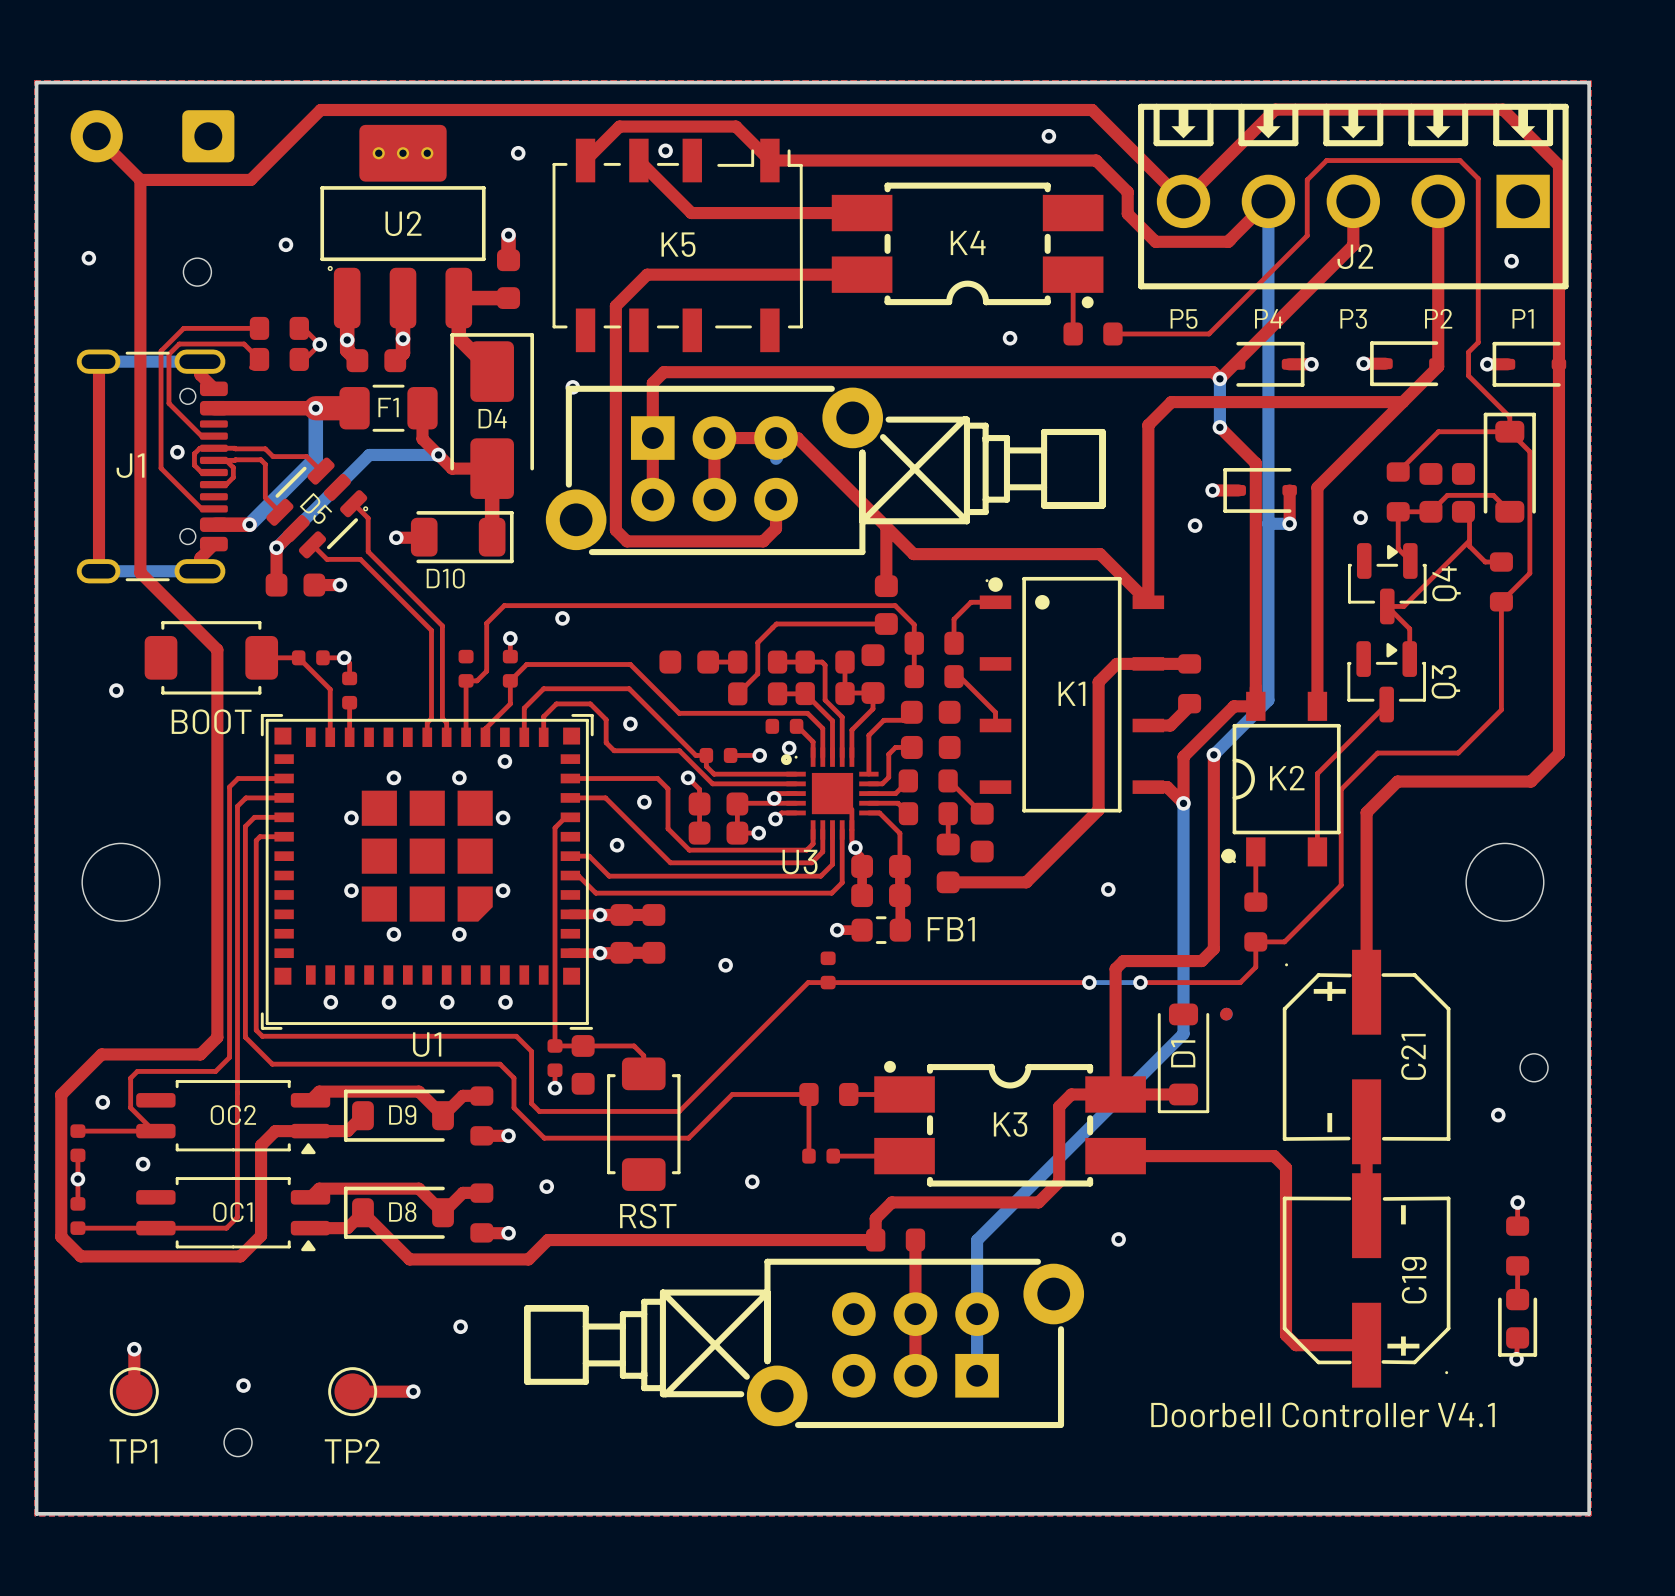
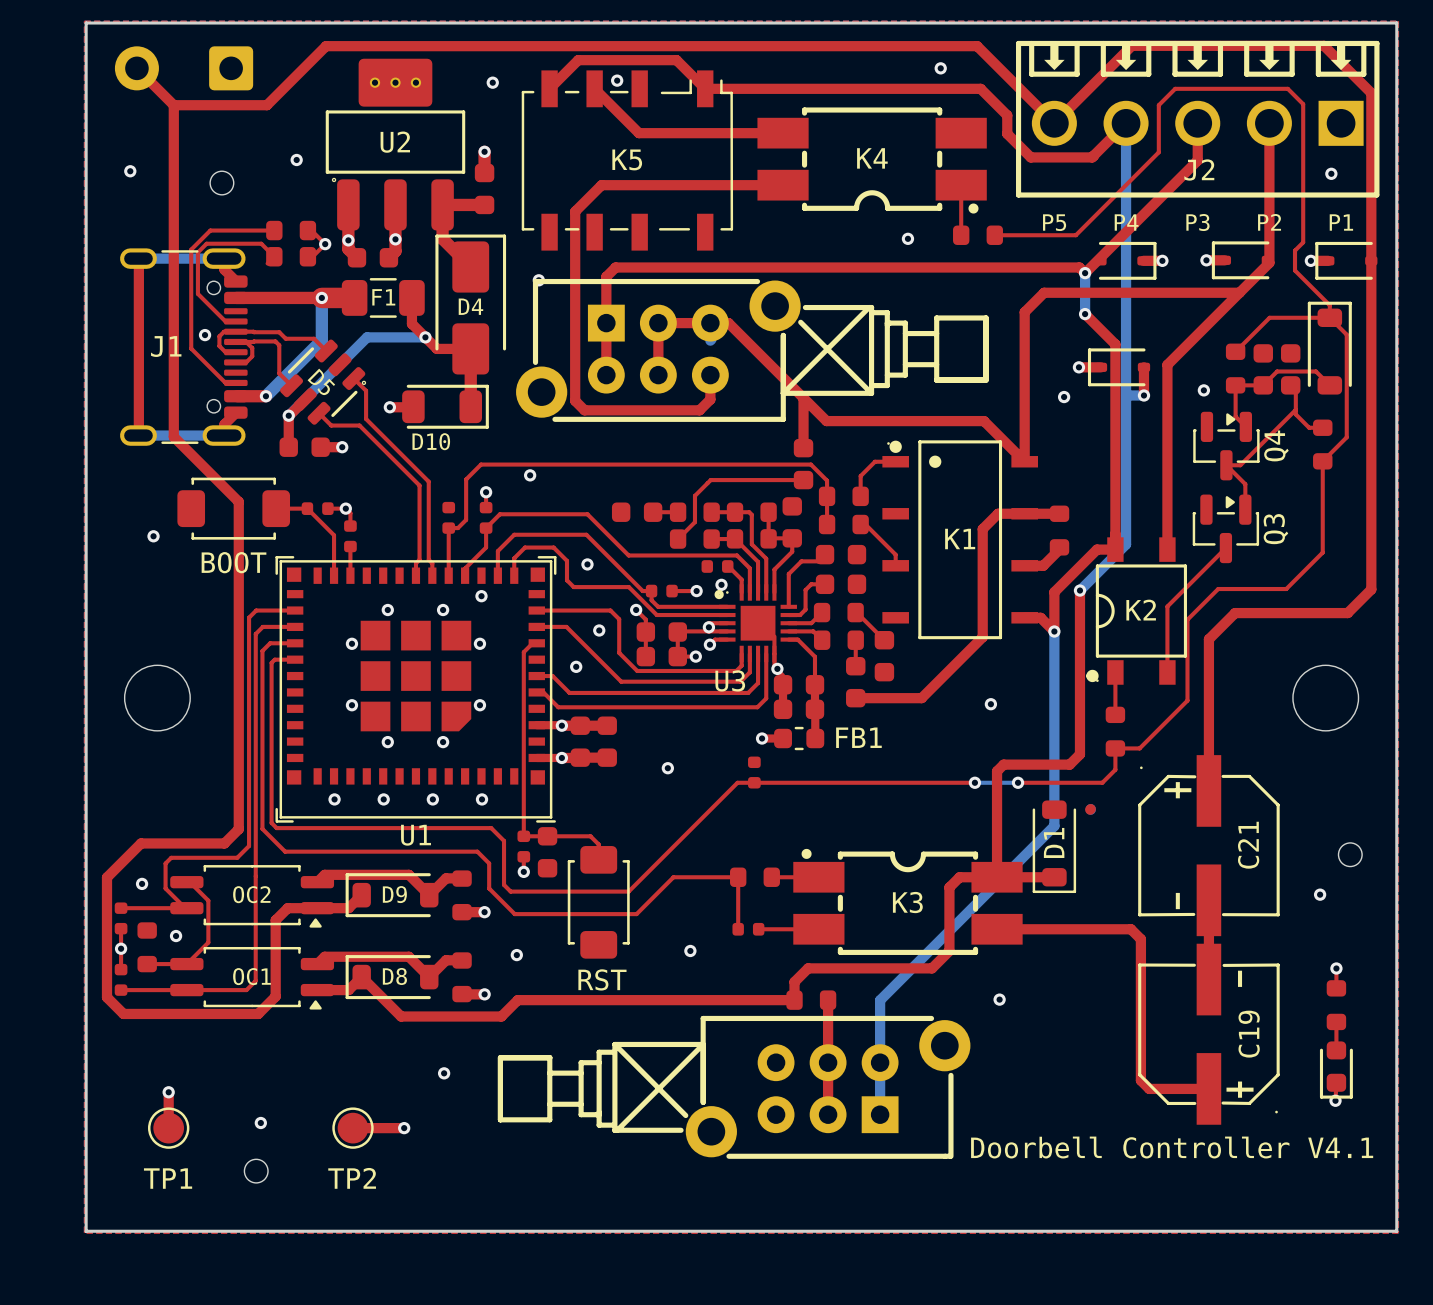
top track: none -> (189, 882) (208, 900) (208, 942) (186, 964) (147, 964)
part: none -> (147, 947)

